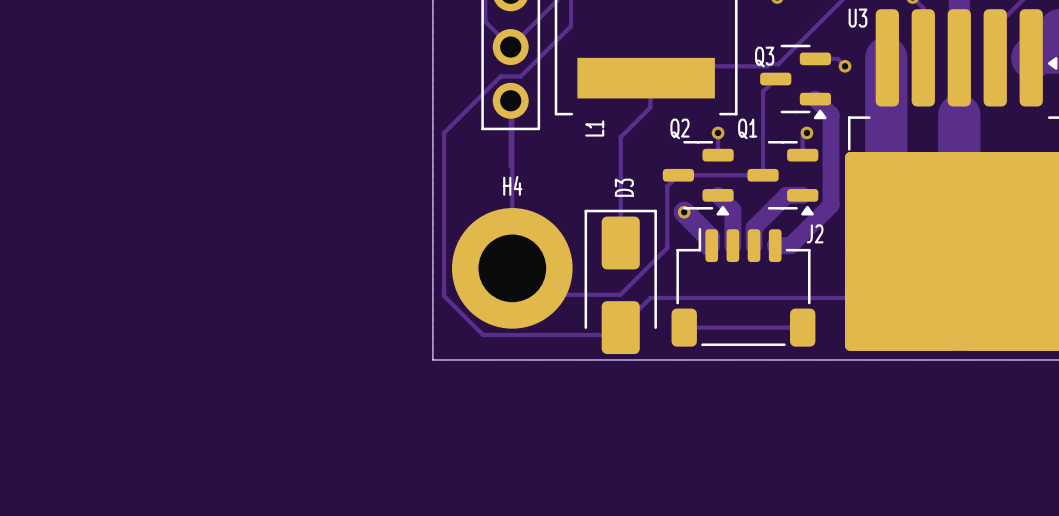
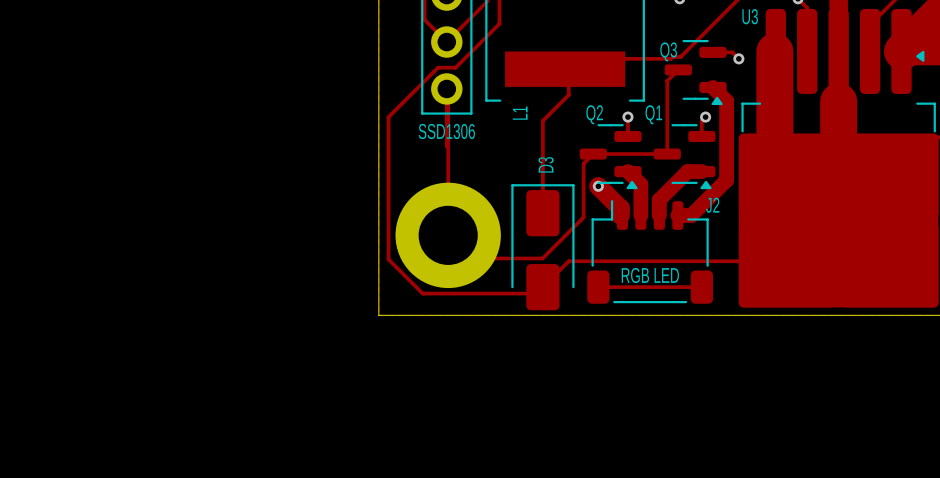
part value: none -> SSD1306 (446, 131)
H4 name: H4 (512, 185) -> none
J2 value: none -> RGB LED (650, 275)

